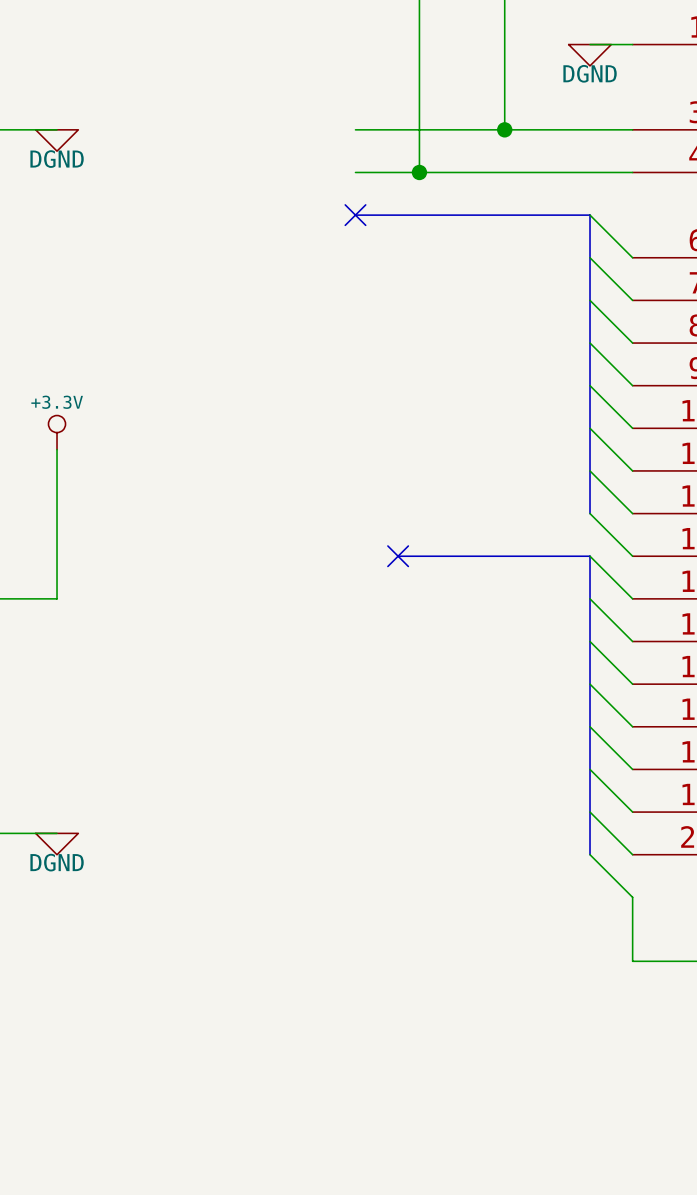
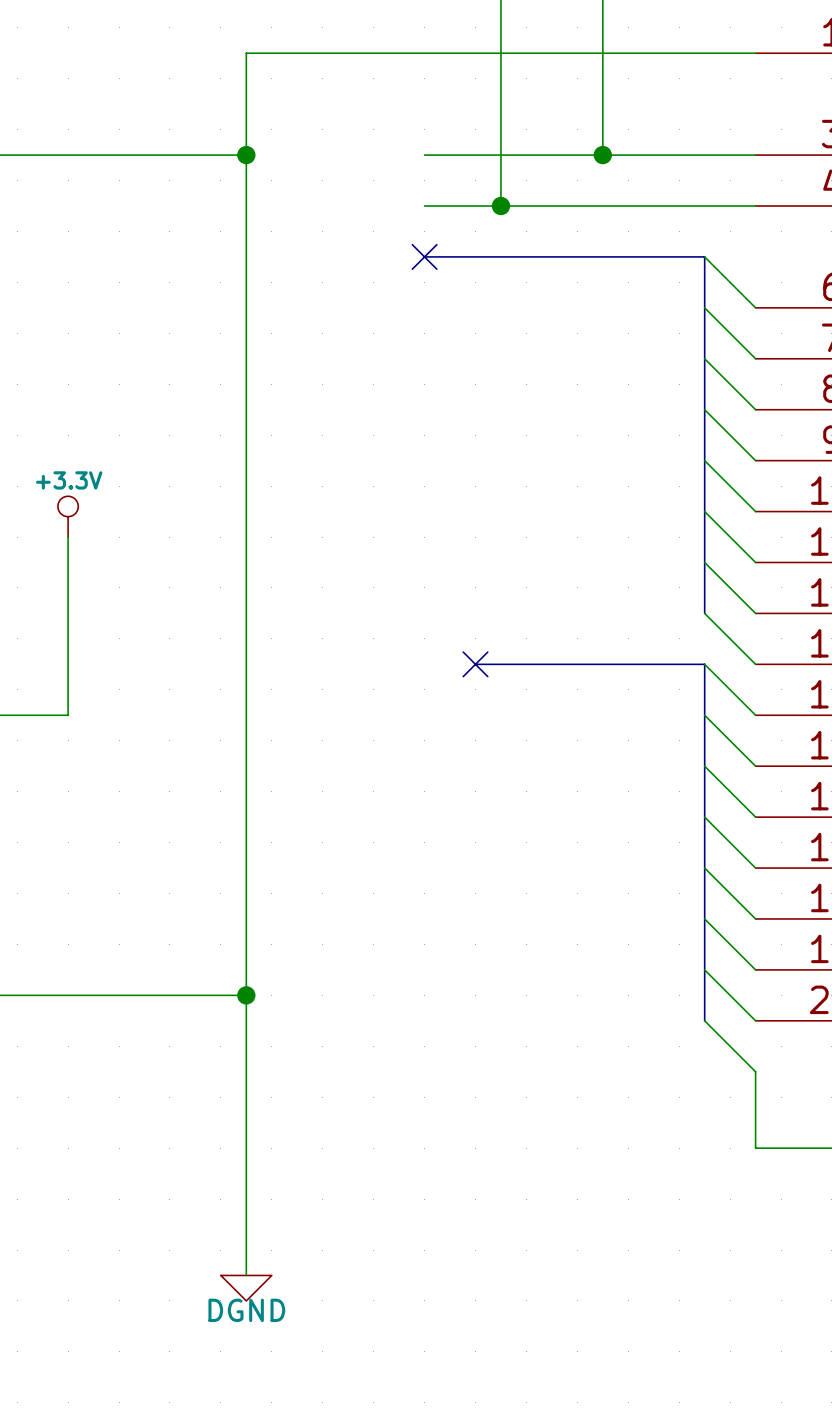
wire: none -> (704, 53) (246, 53) (246, 1275)
power symbol: DGND (590, 55) -> none
wire: none -> (68, 155) (246, 155)
junction: none -> (246, 155)
power symbol: DGND (57, 140) -> none
wire: none -> (68, 995) (246, 995)
junction: none -> (246, 995)
power symbol position: DGND (57, 844) -> DGND (246, 1288)

